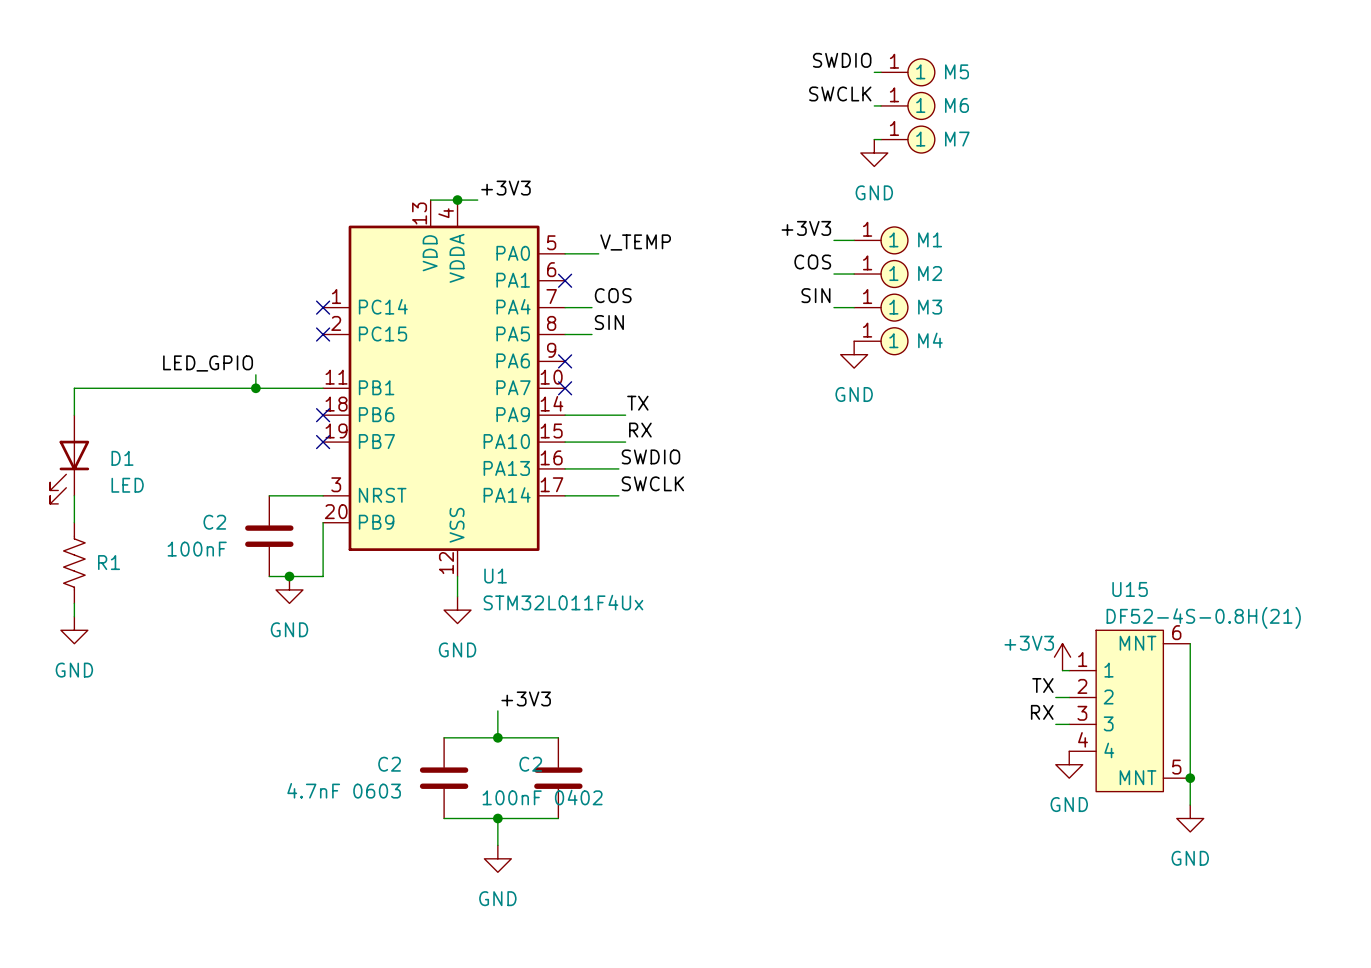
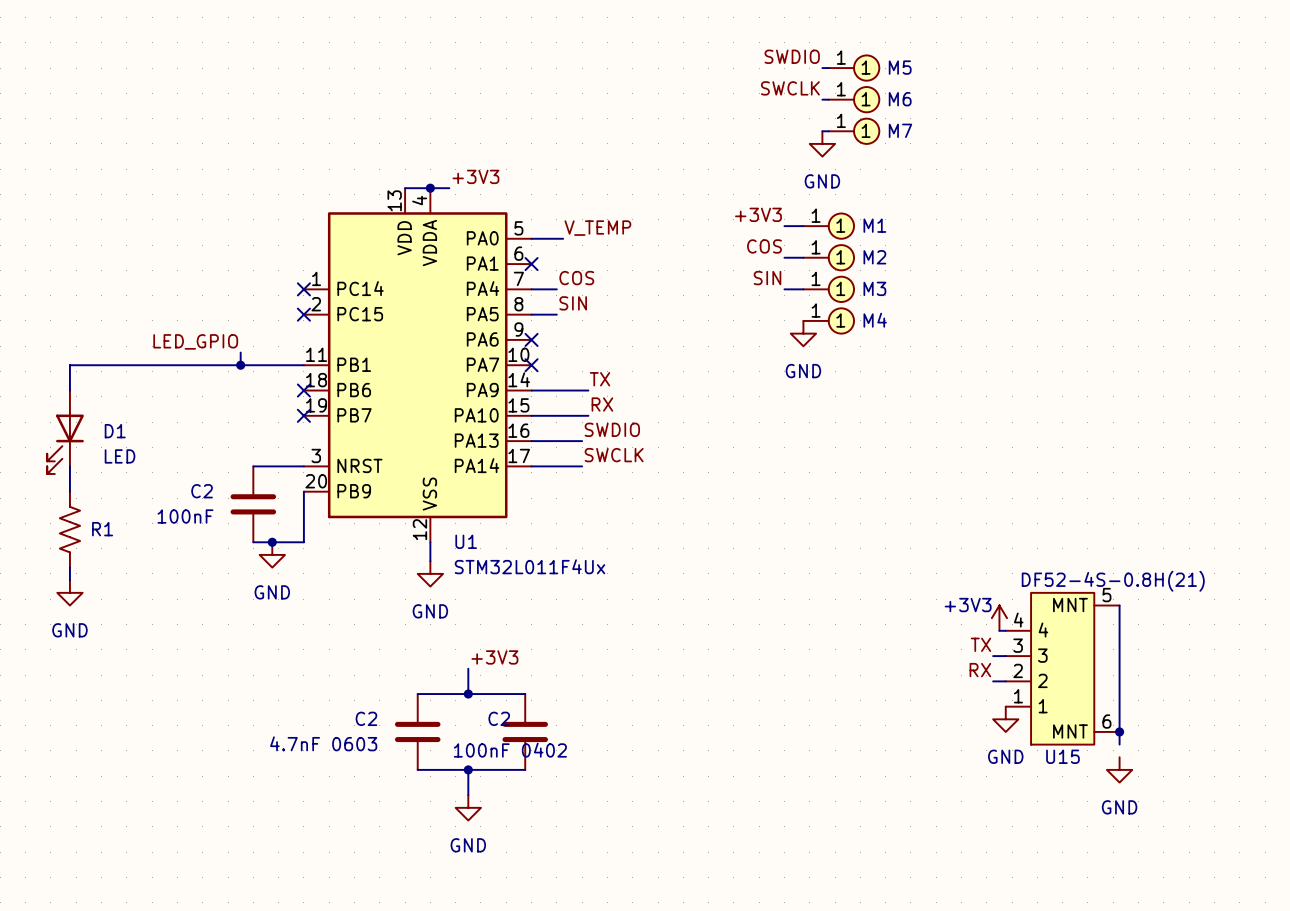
U15 name position: U15 (1130, 589) -> U15 (1062, 756)
U15 flip: as is (1129, 710) -> up-down (1062, 668)
wire: (1190, 791) (1190, 805) -> none

